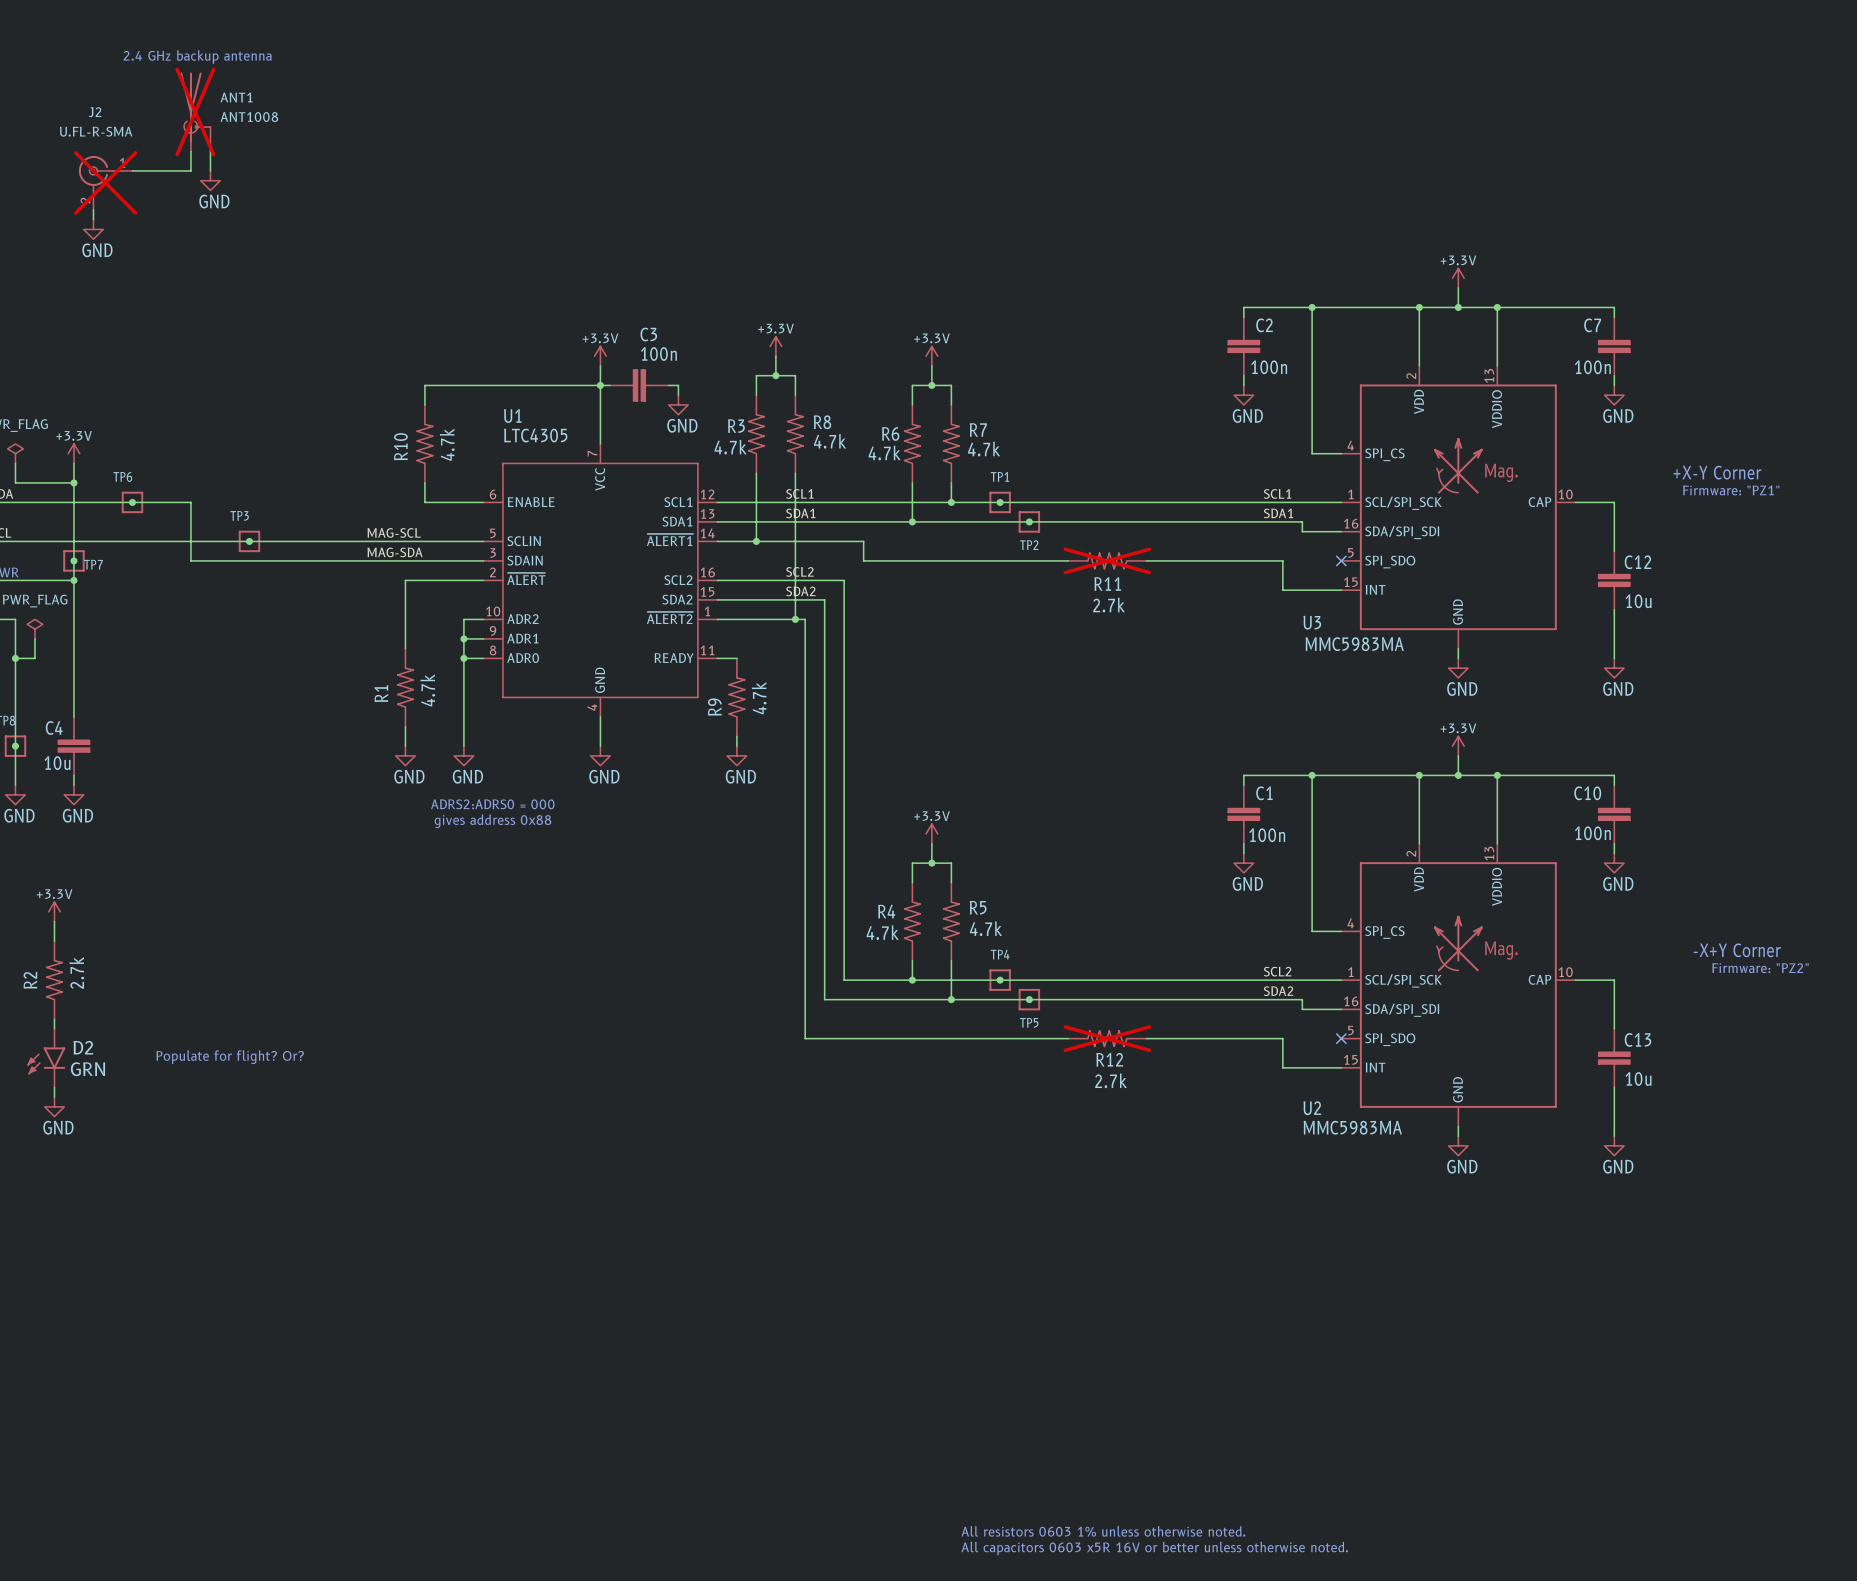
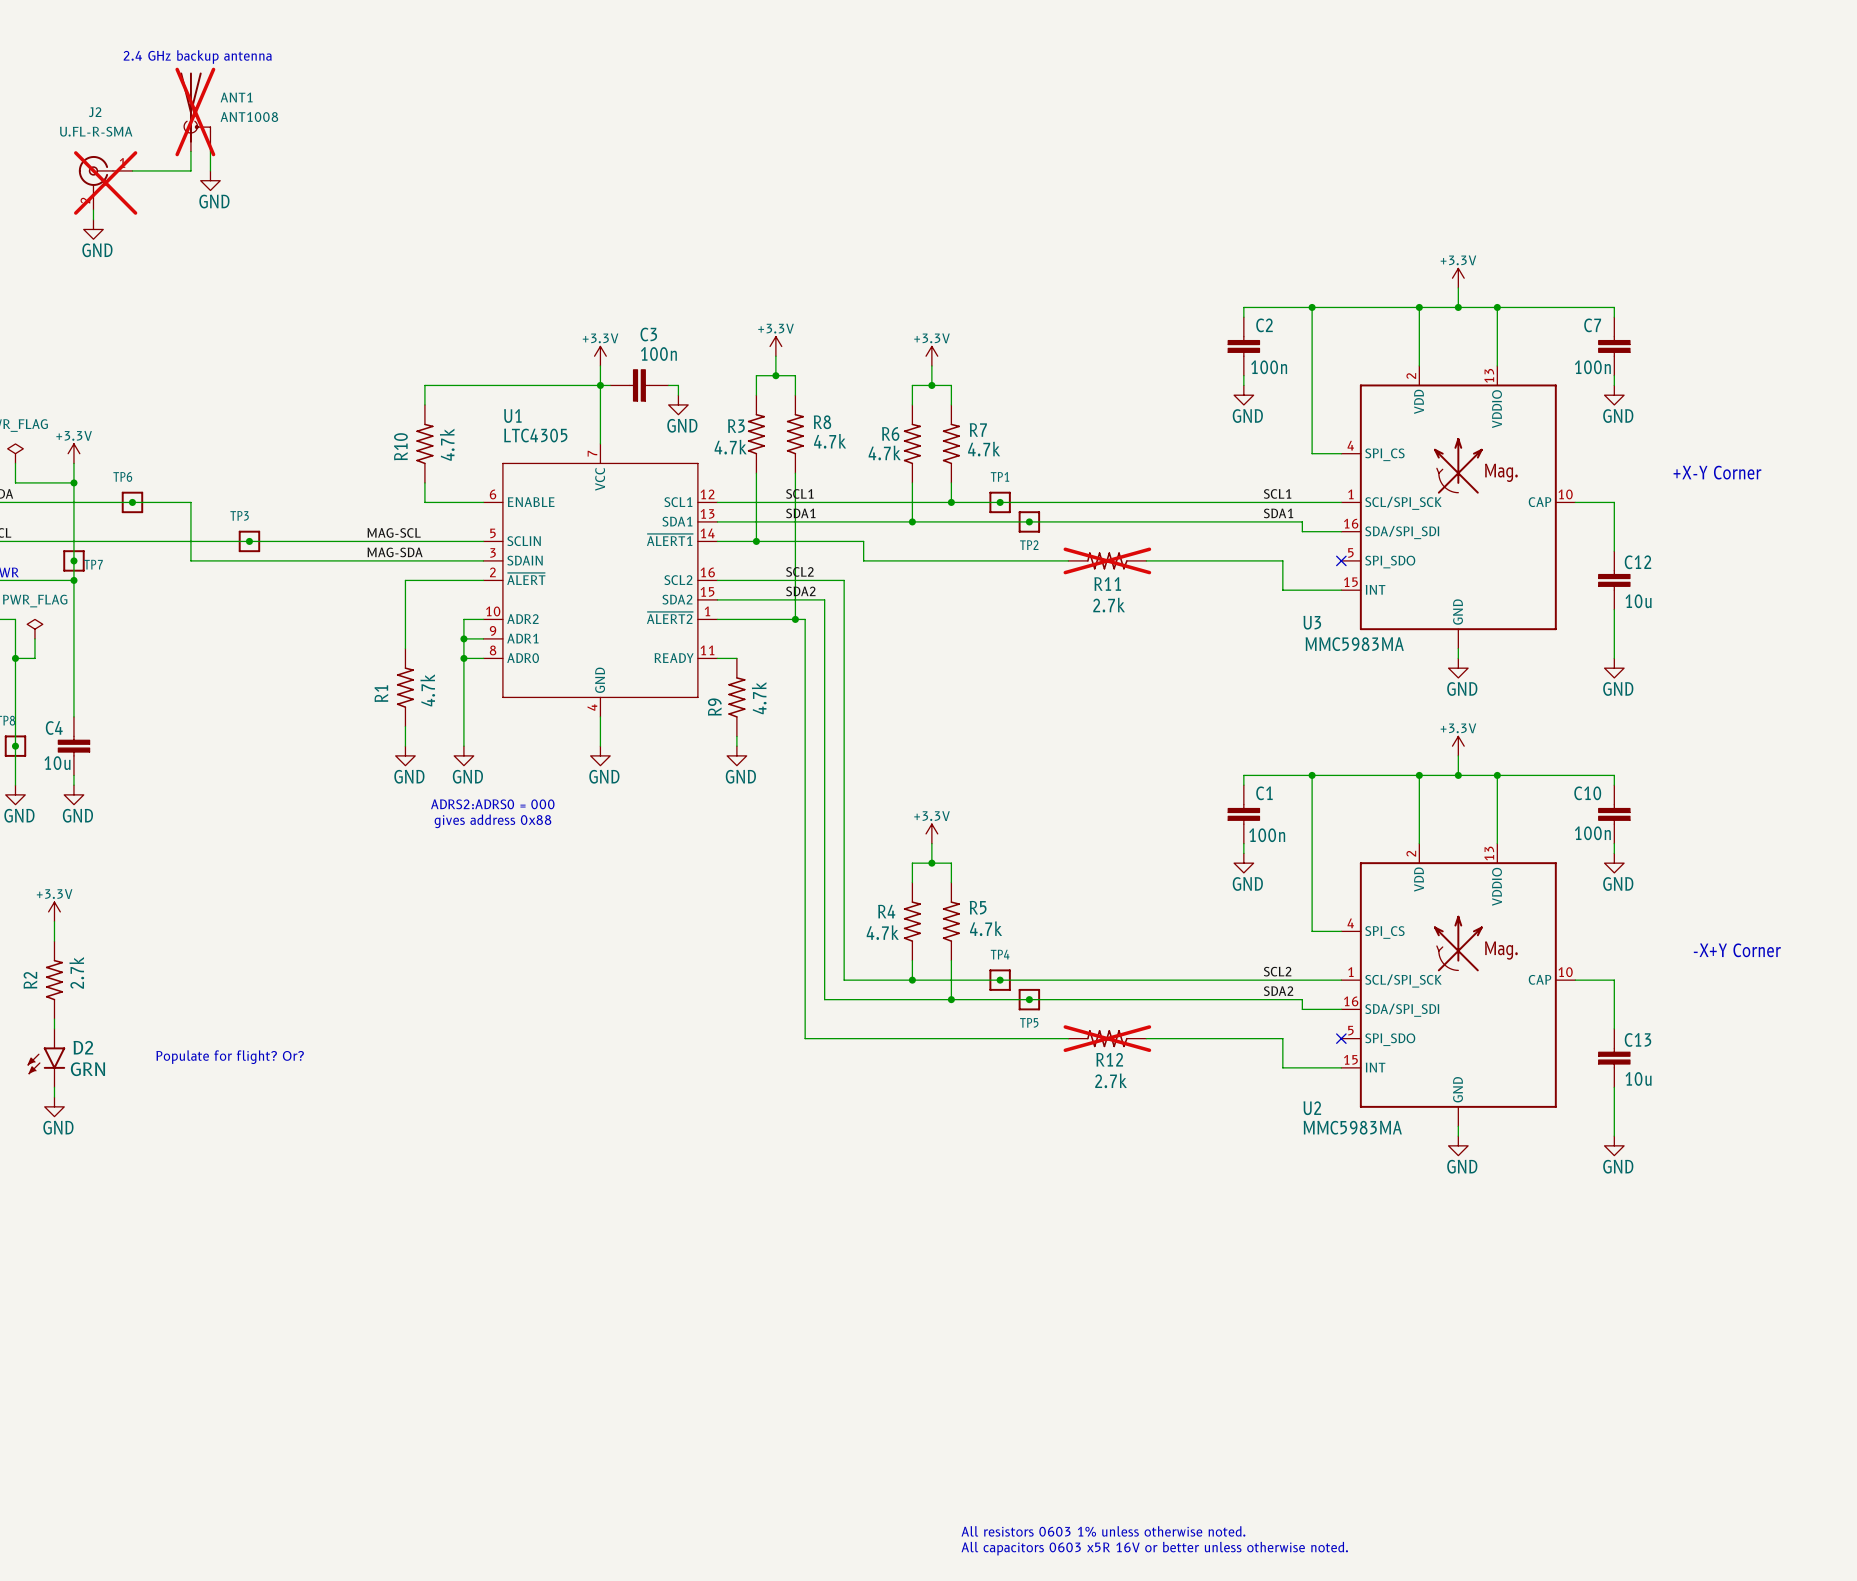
text: Firmware: "PZ1" (1731, 490) -> none
text: Firmware: "PZ2" (1760, 968) -> none

